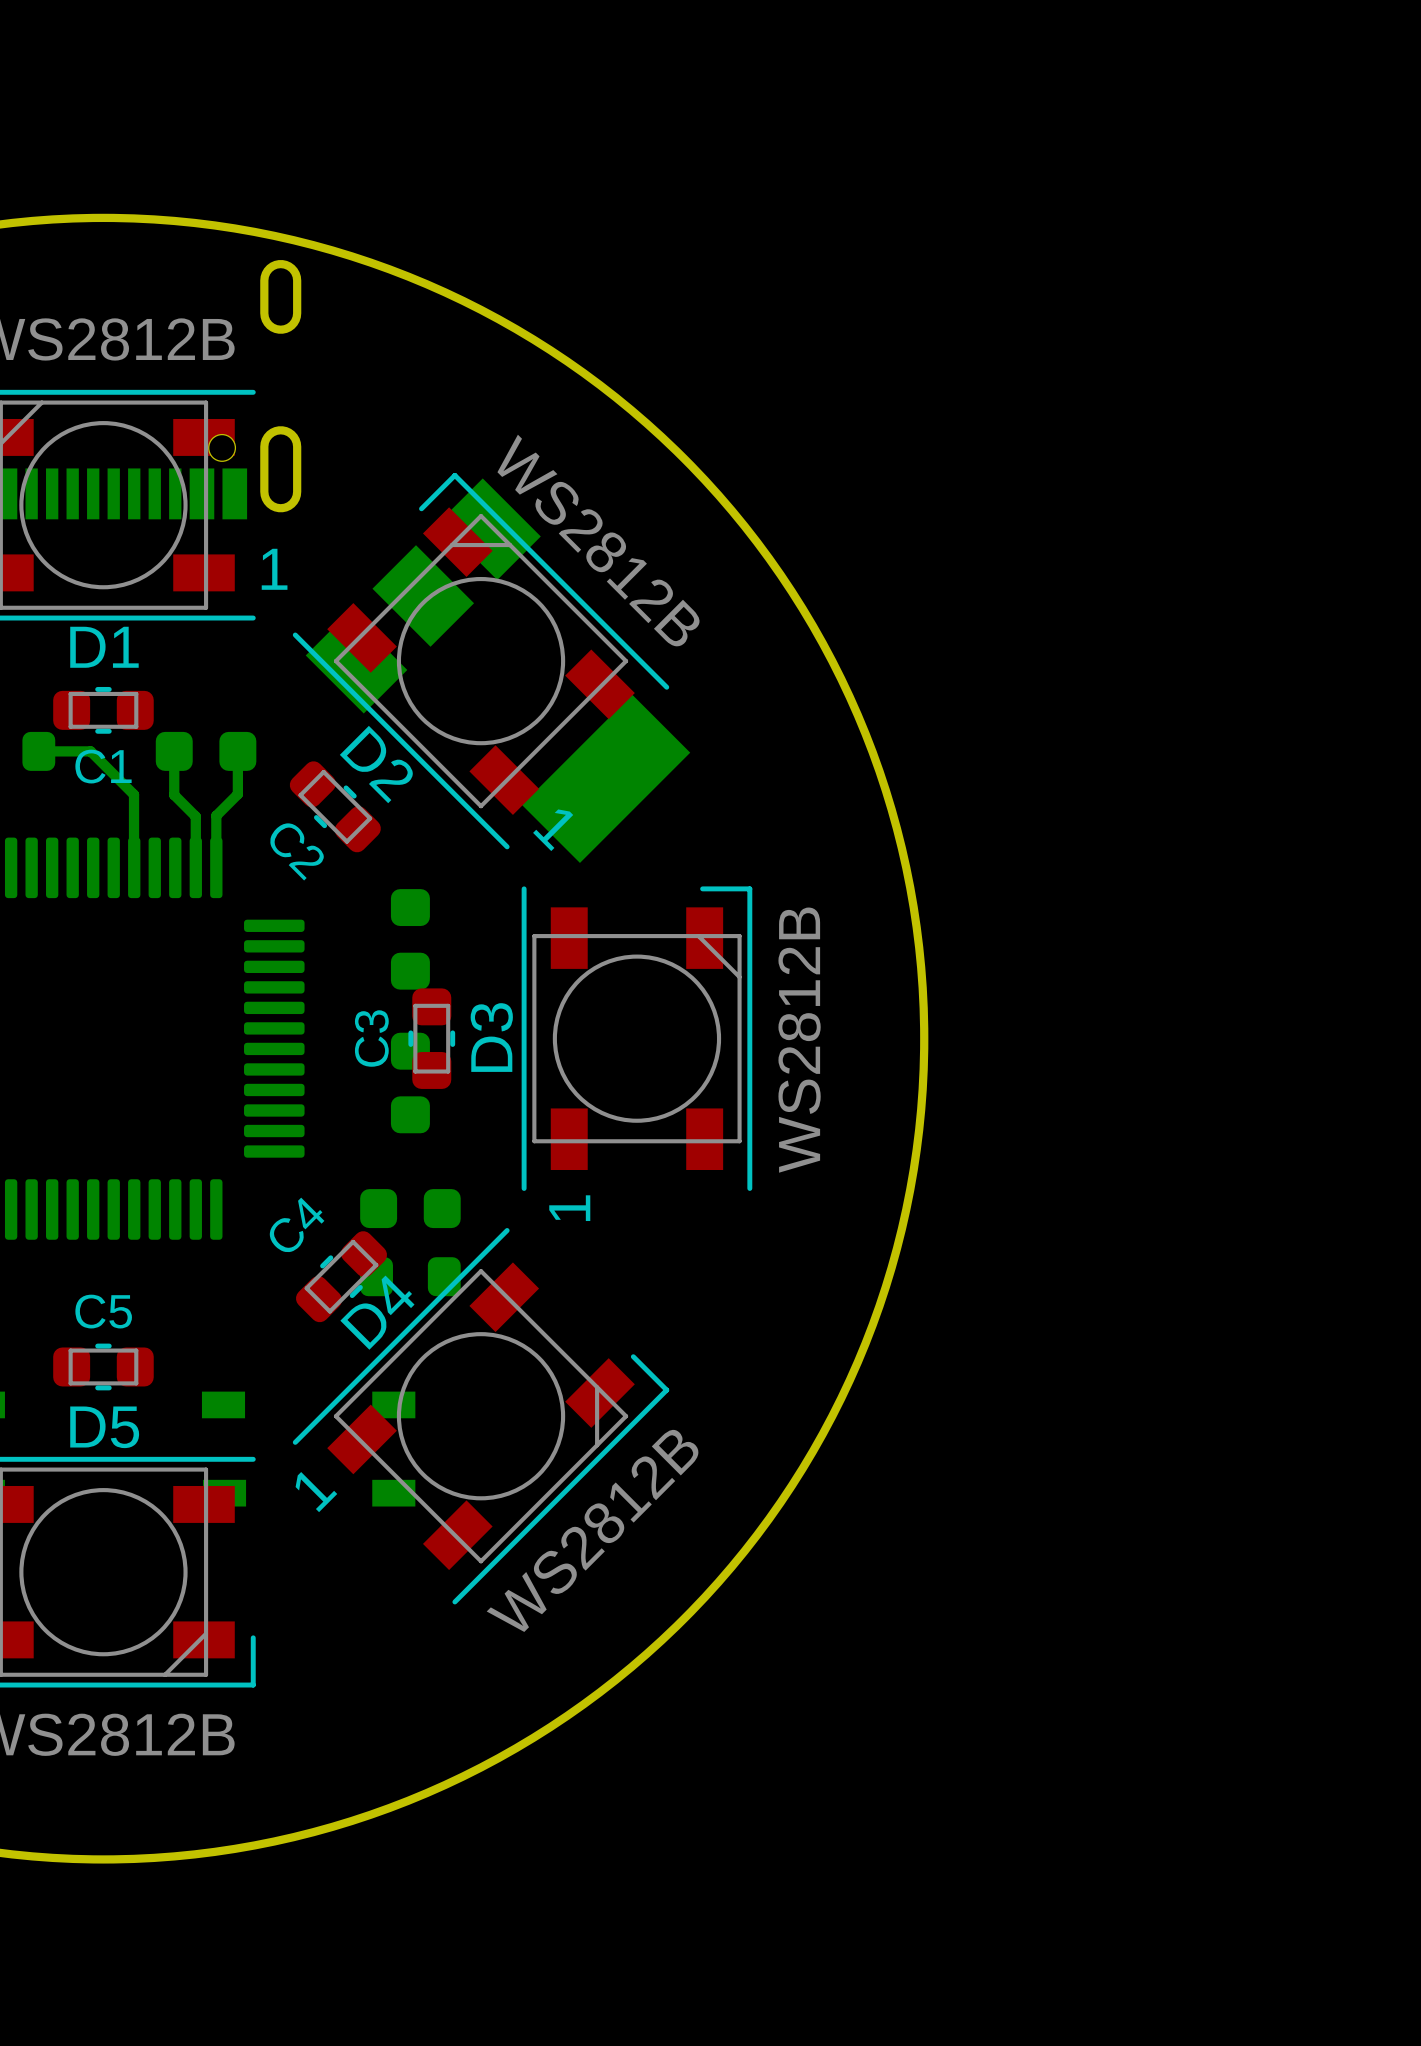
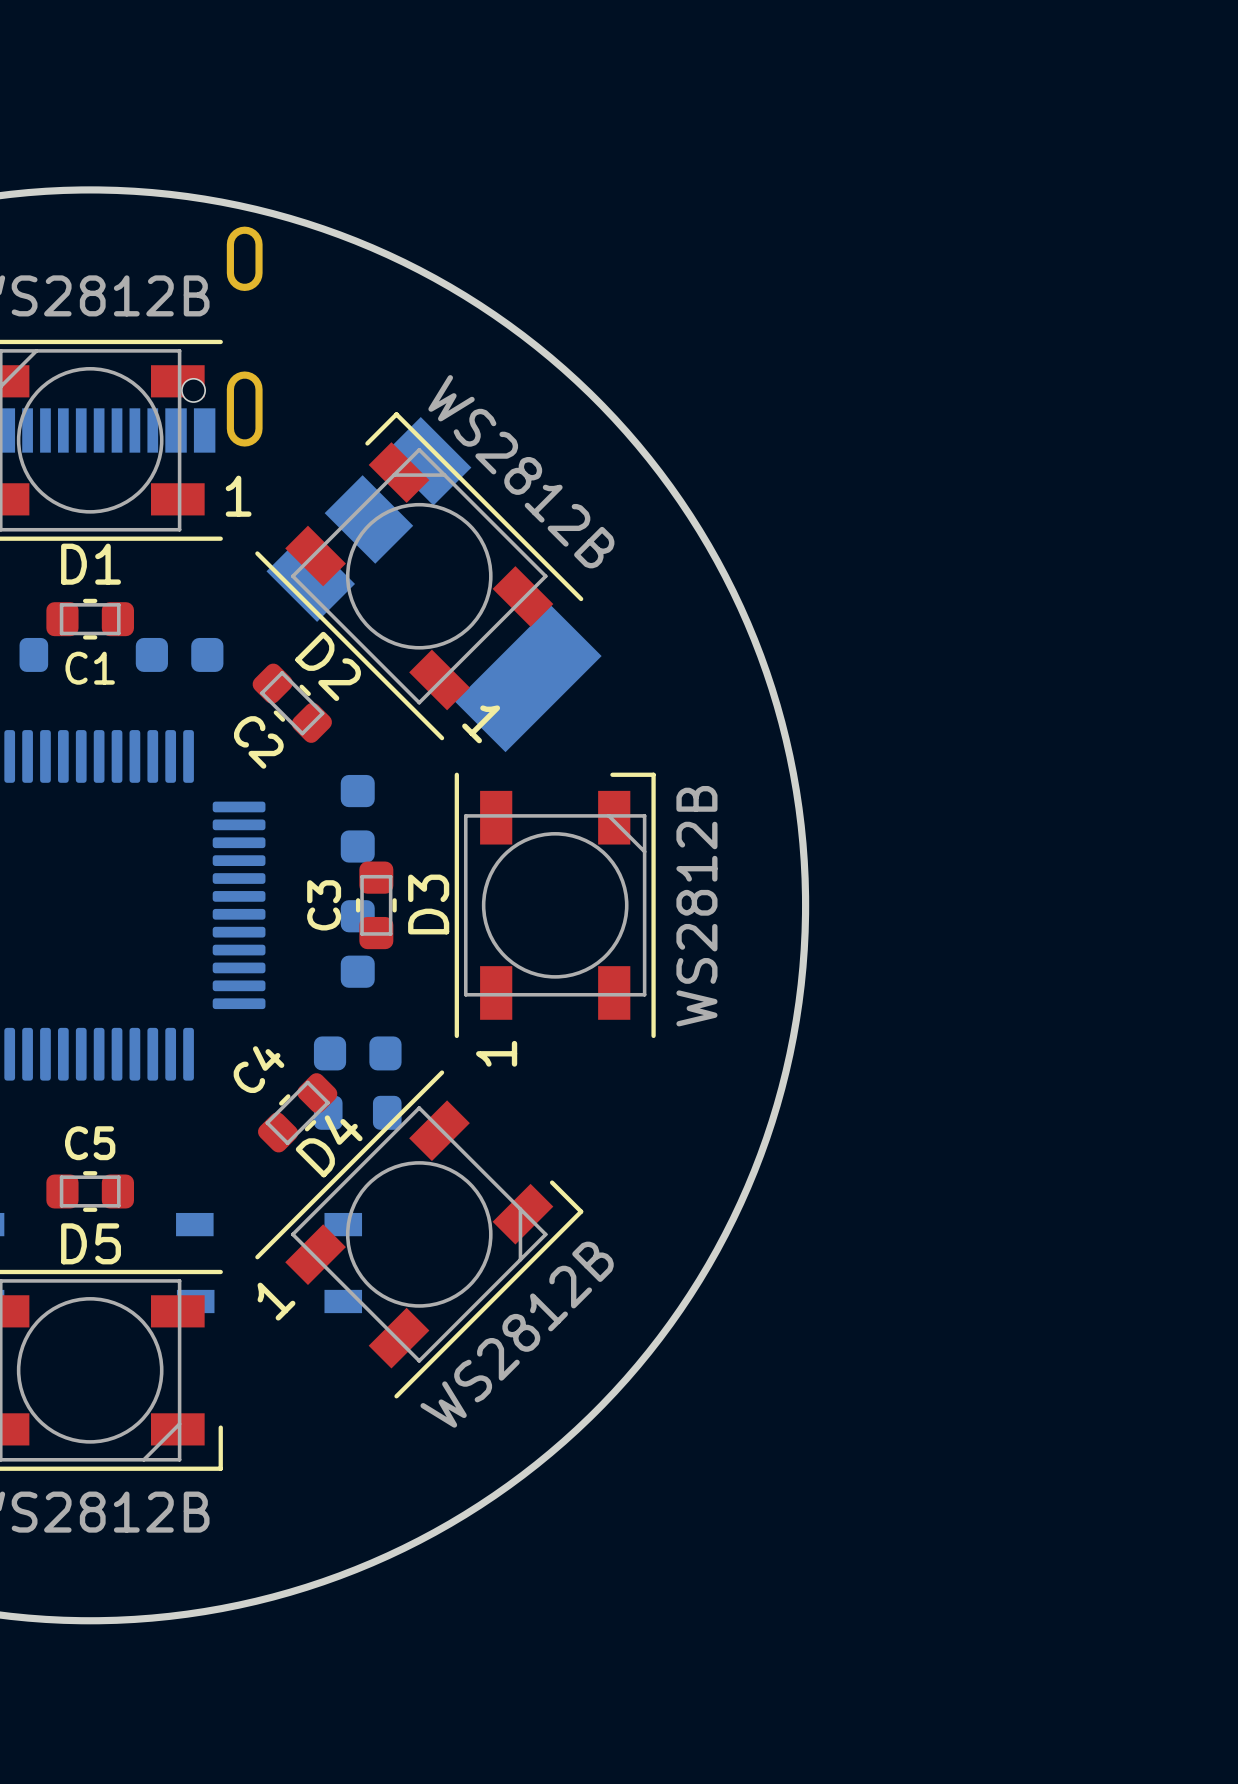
bottom track: (38, 751) (90, 751) (134, 794) (134, 867) -> none
bottom track: (174, 751) (174, 795) (195, 816) (195, 867) -> none
bottom track: (237, 751) (237, 794) (216, 815) (216, 867) -> none

